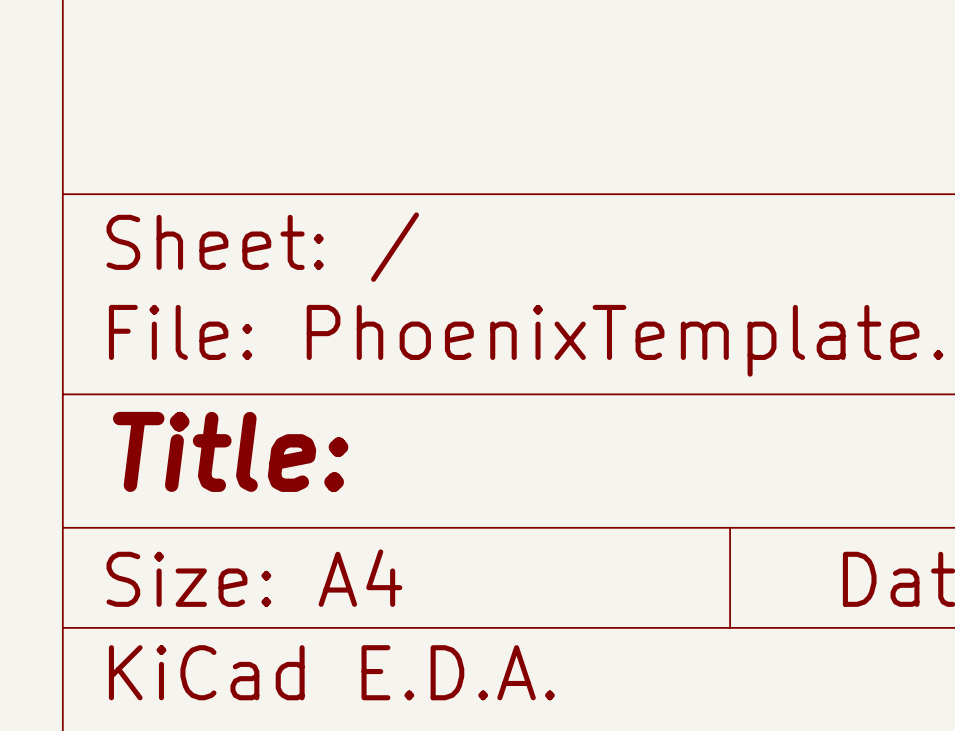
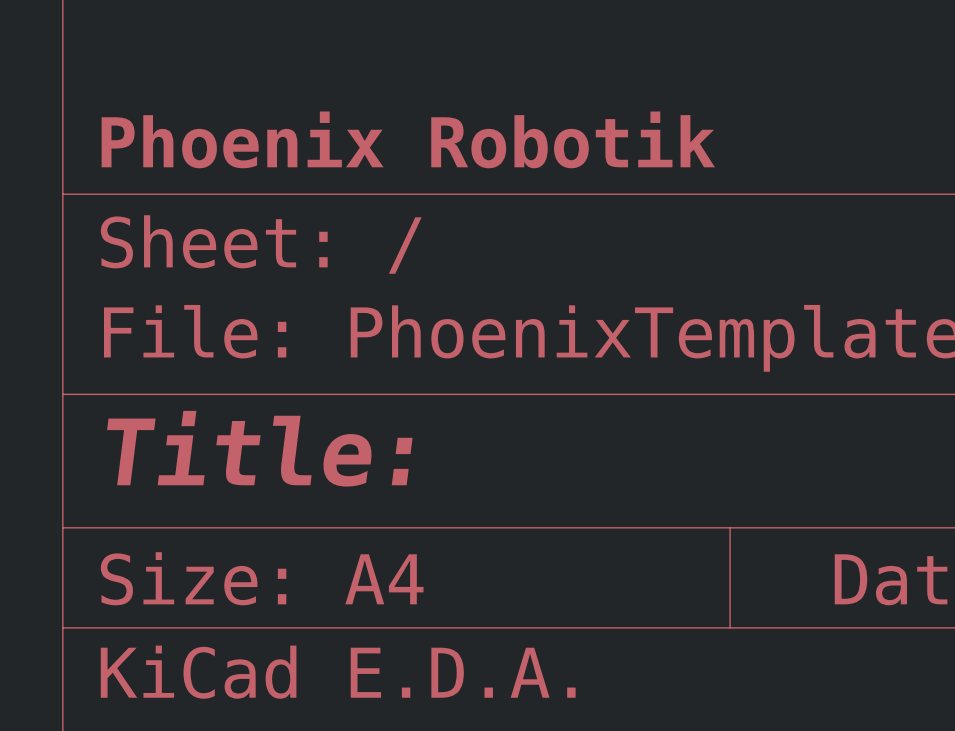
title block: none -> Phoenix Robotik (408, 139)

